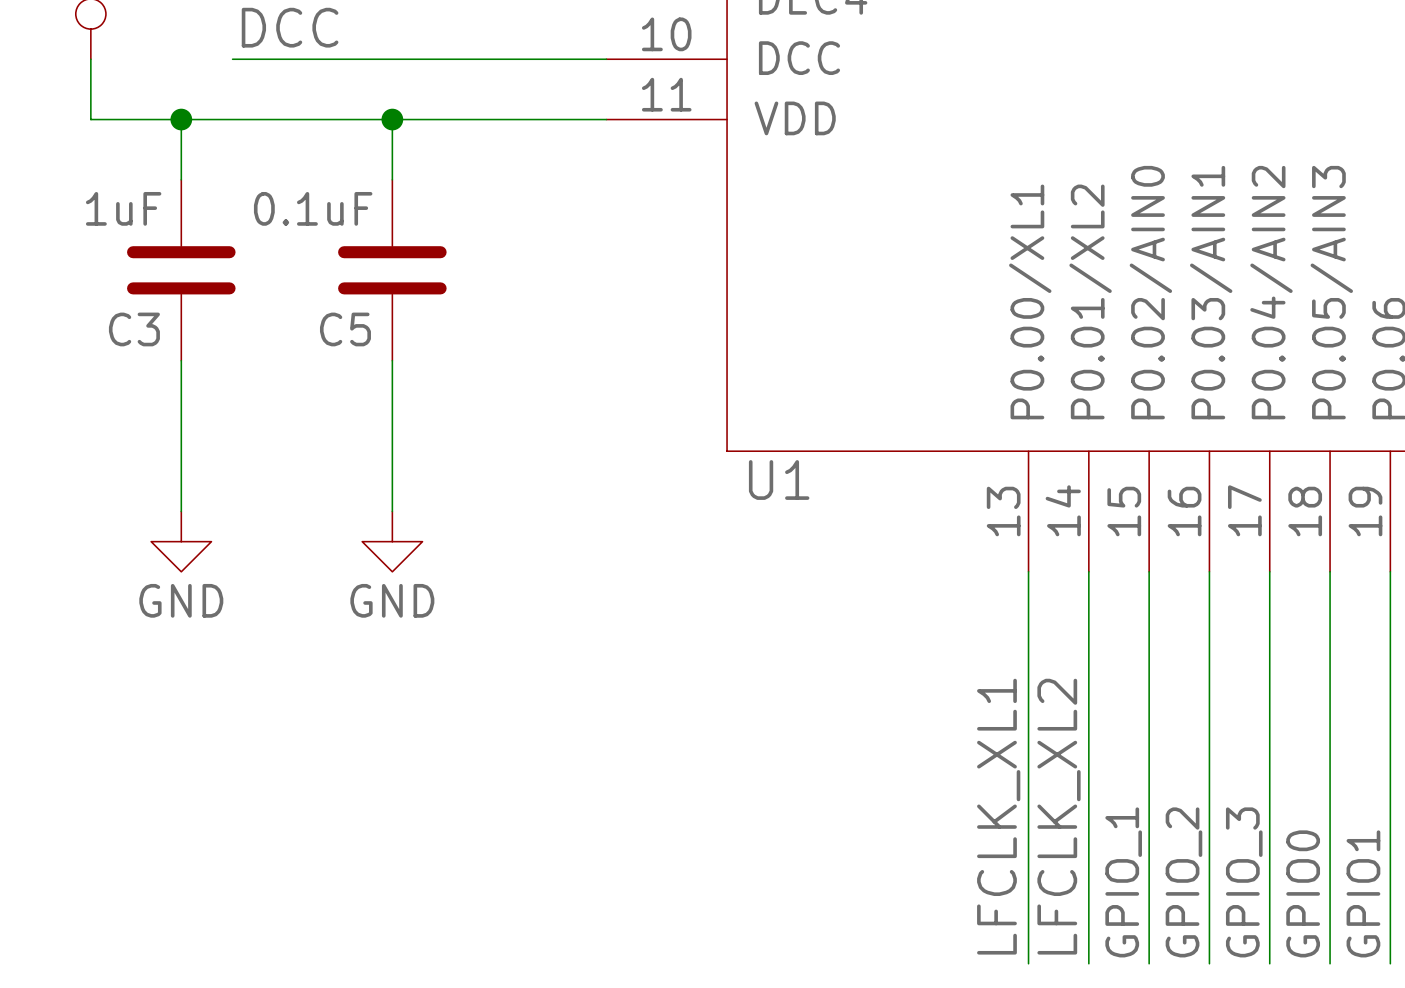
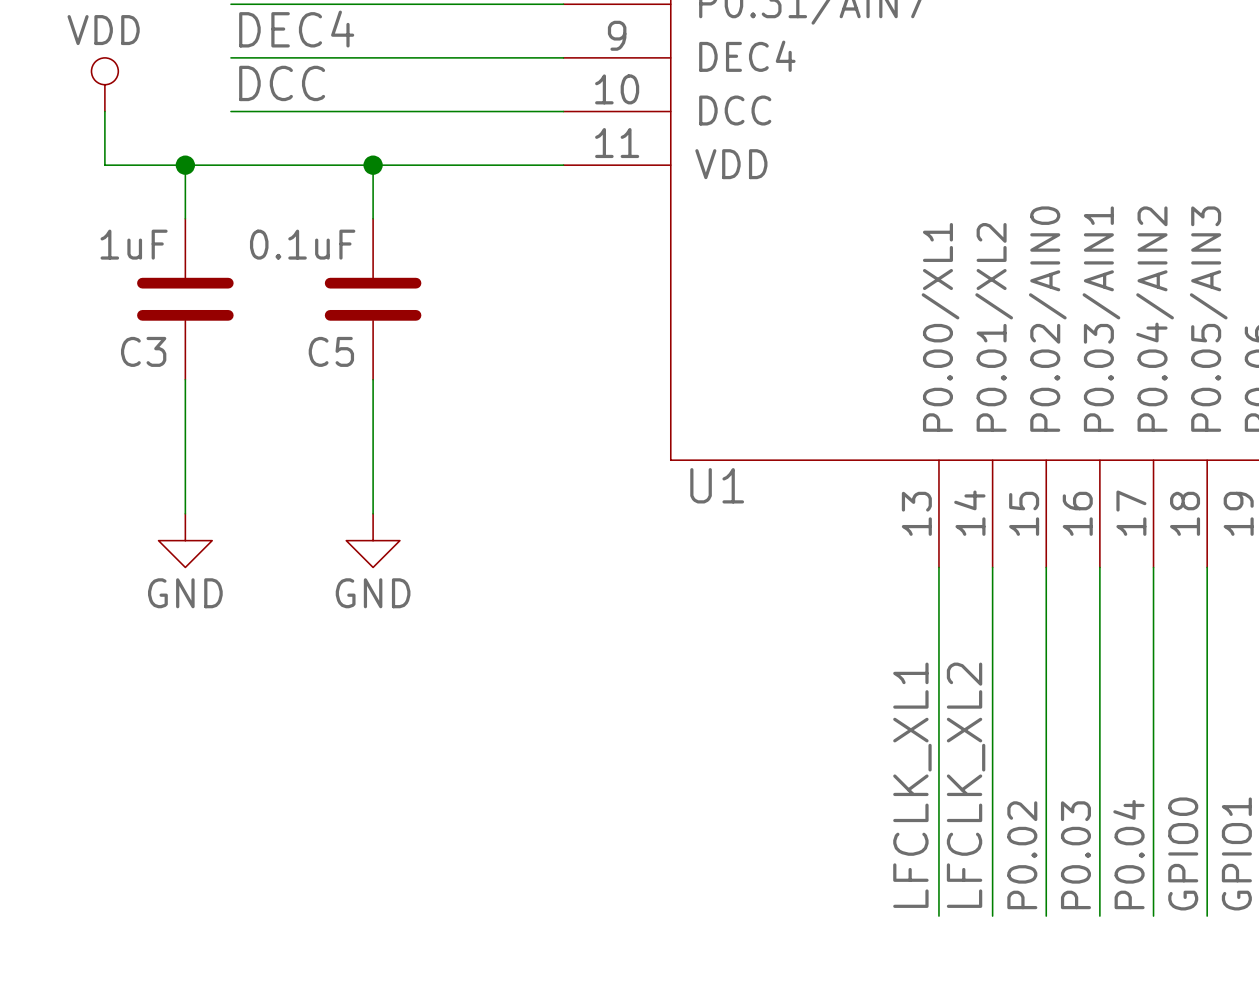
label: GPIO_1 (1123, 882) -> P0.02 (1022, 855)
label: GPIO_2 (1183, 882) -> P0.03 (1075, 855)
label: GPIO_3 (1244, 882) -> P0.04 (1128, 854)

